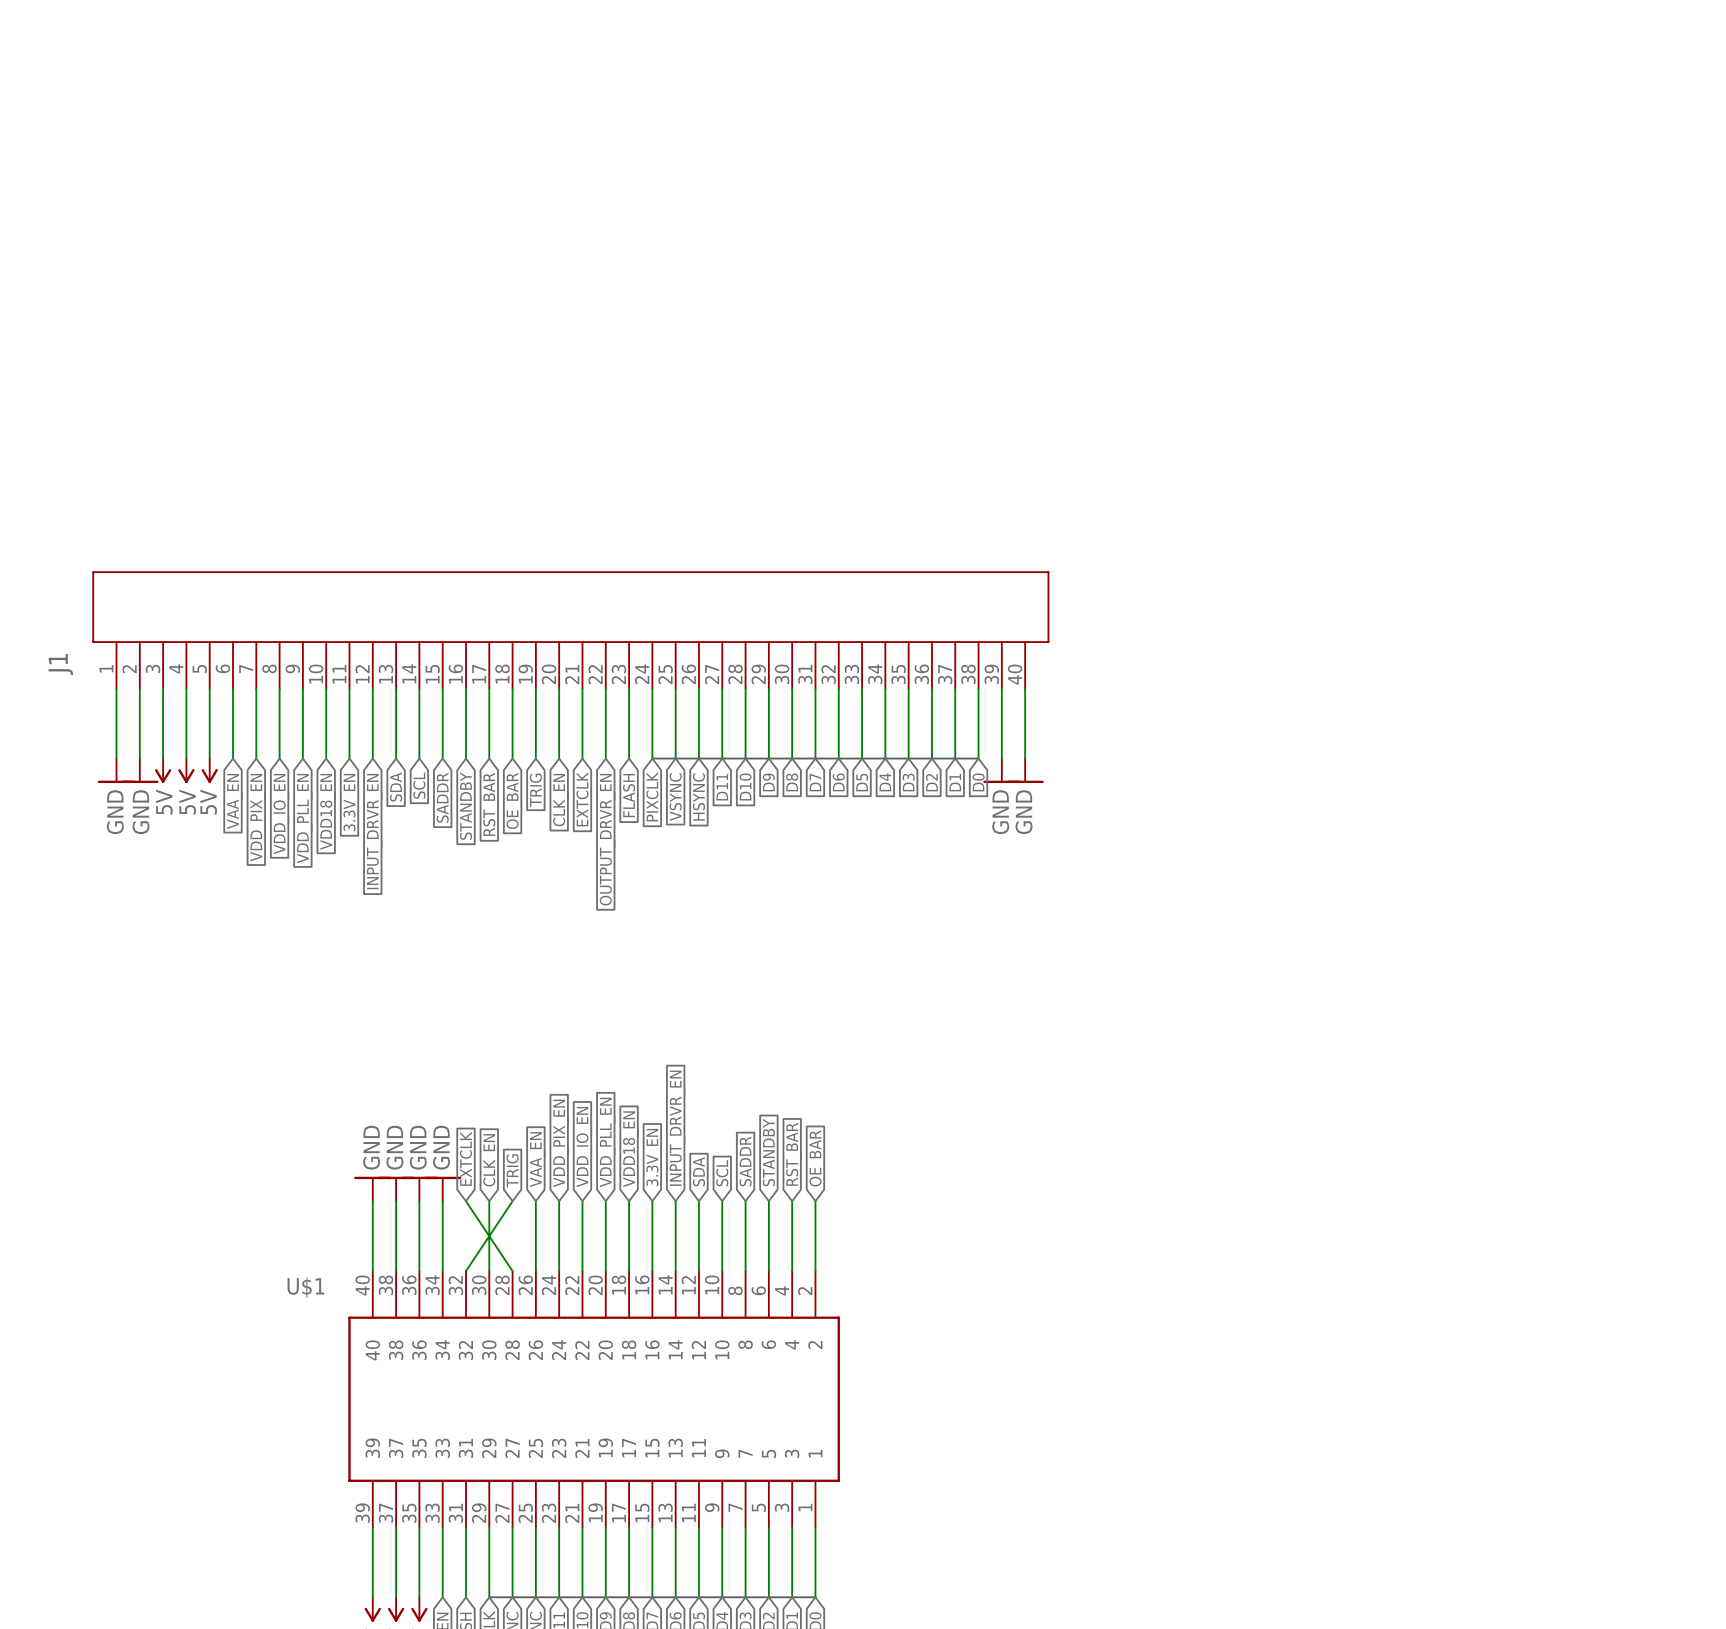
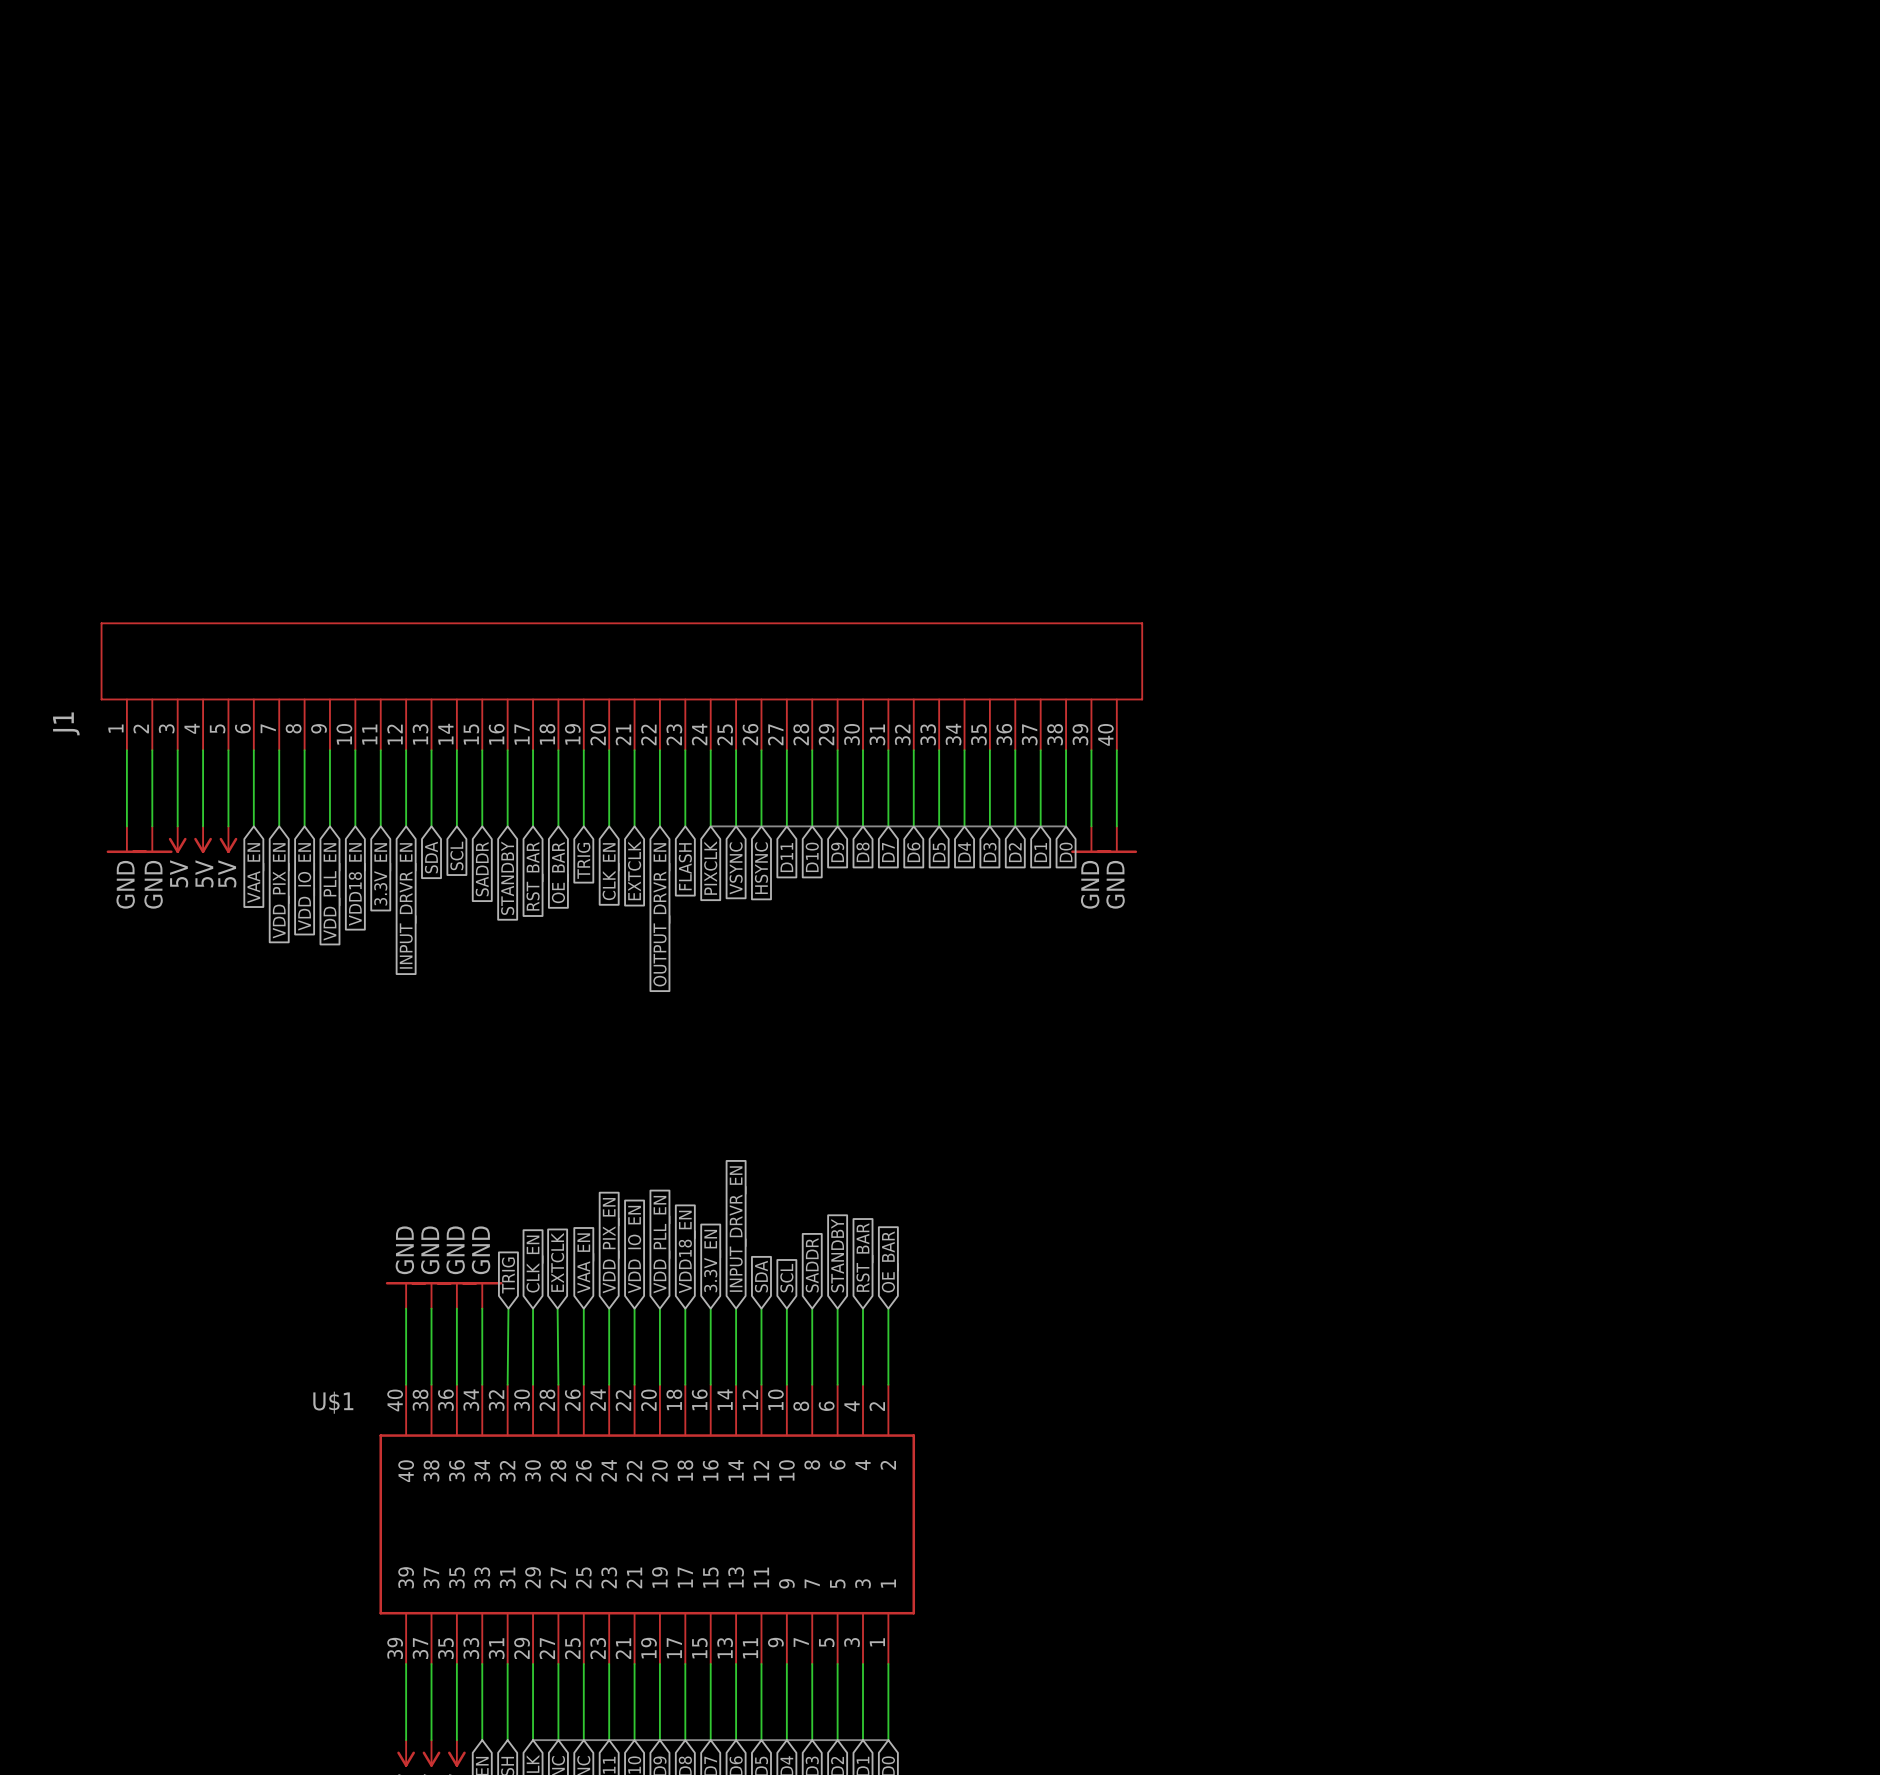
global label: EXTCLK (465, 1158) -> TRIG (508, 1275)
global label: TRIG (512, 1170) -> EXTCLK (557, 1262)
wire: (465, 1201) (512, 1271) -> (557, 1308) (558, 1384)
wire: (512, 1201) (465, 1271) -> (508, 1308) (507, 1384)

